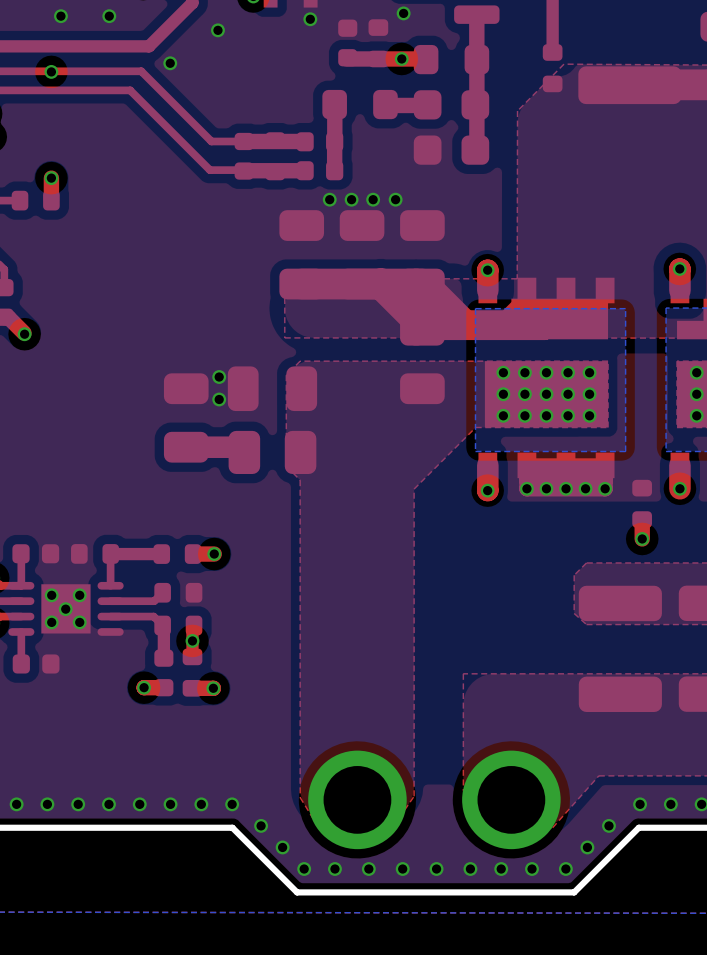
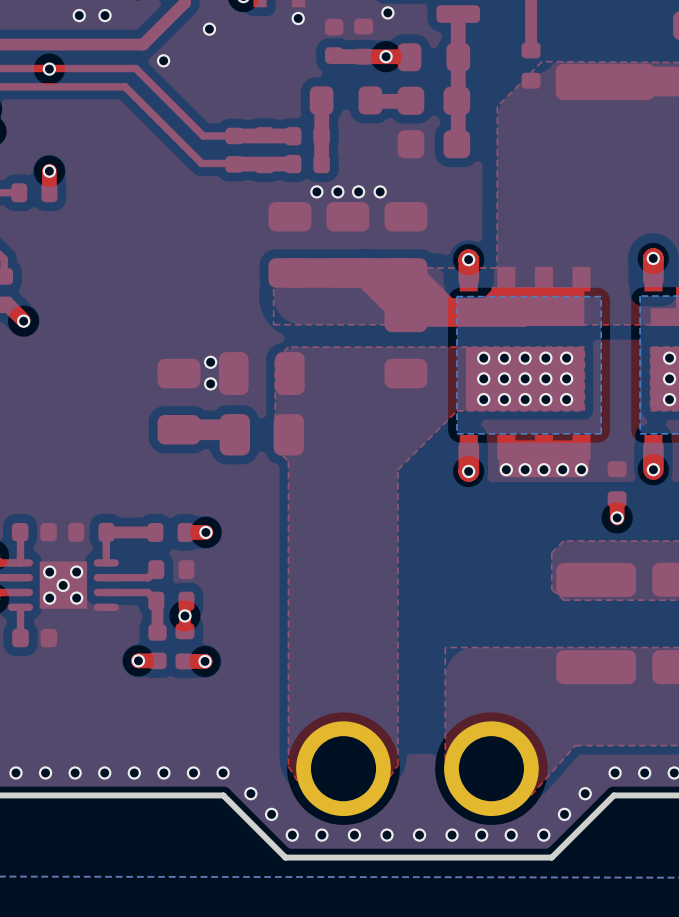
via: (60, 16) -> none
via: none -> (79, 15)

